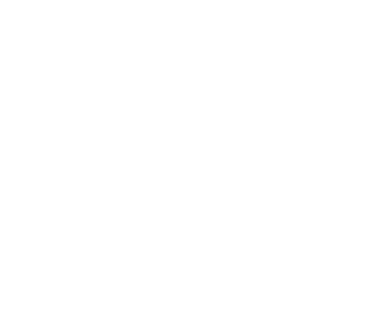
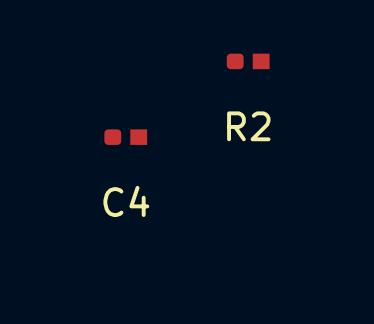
R2: none -> (248, 61)
C4: none -> (125, 137)

